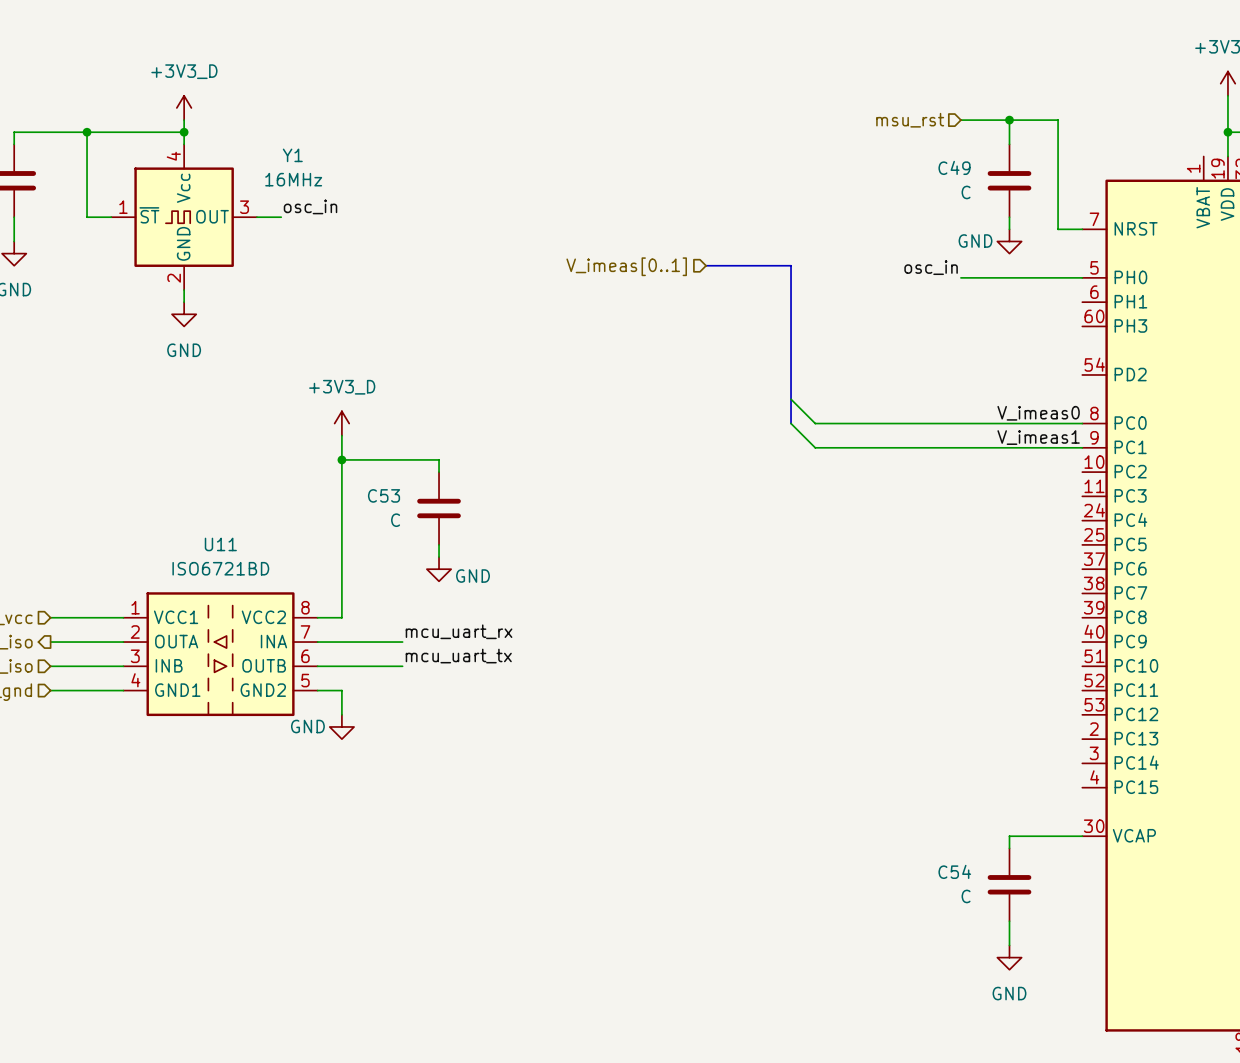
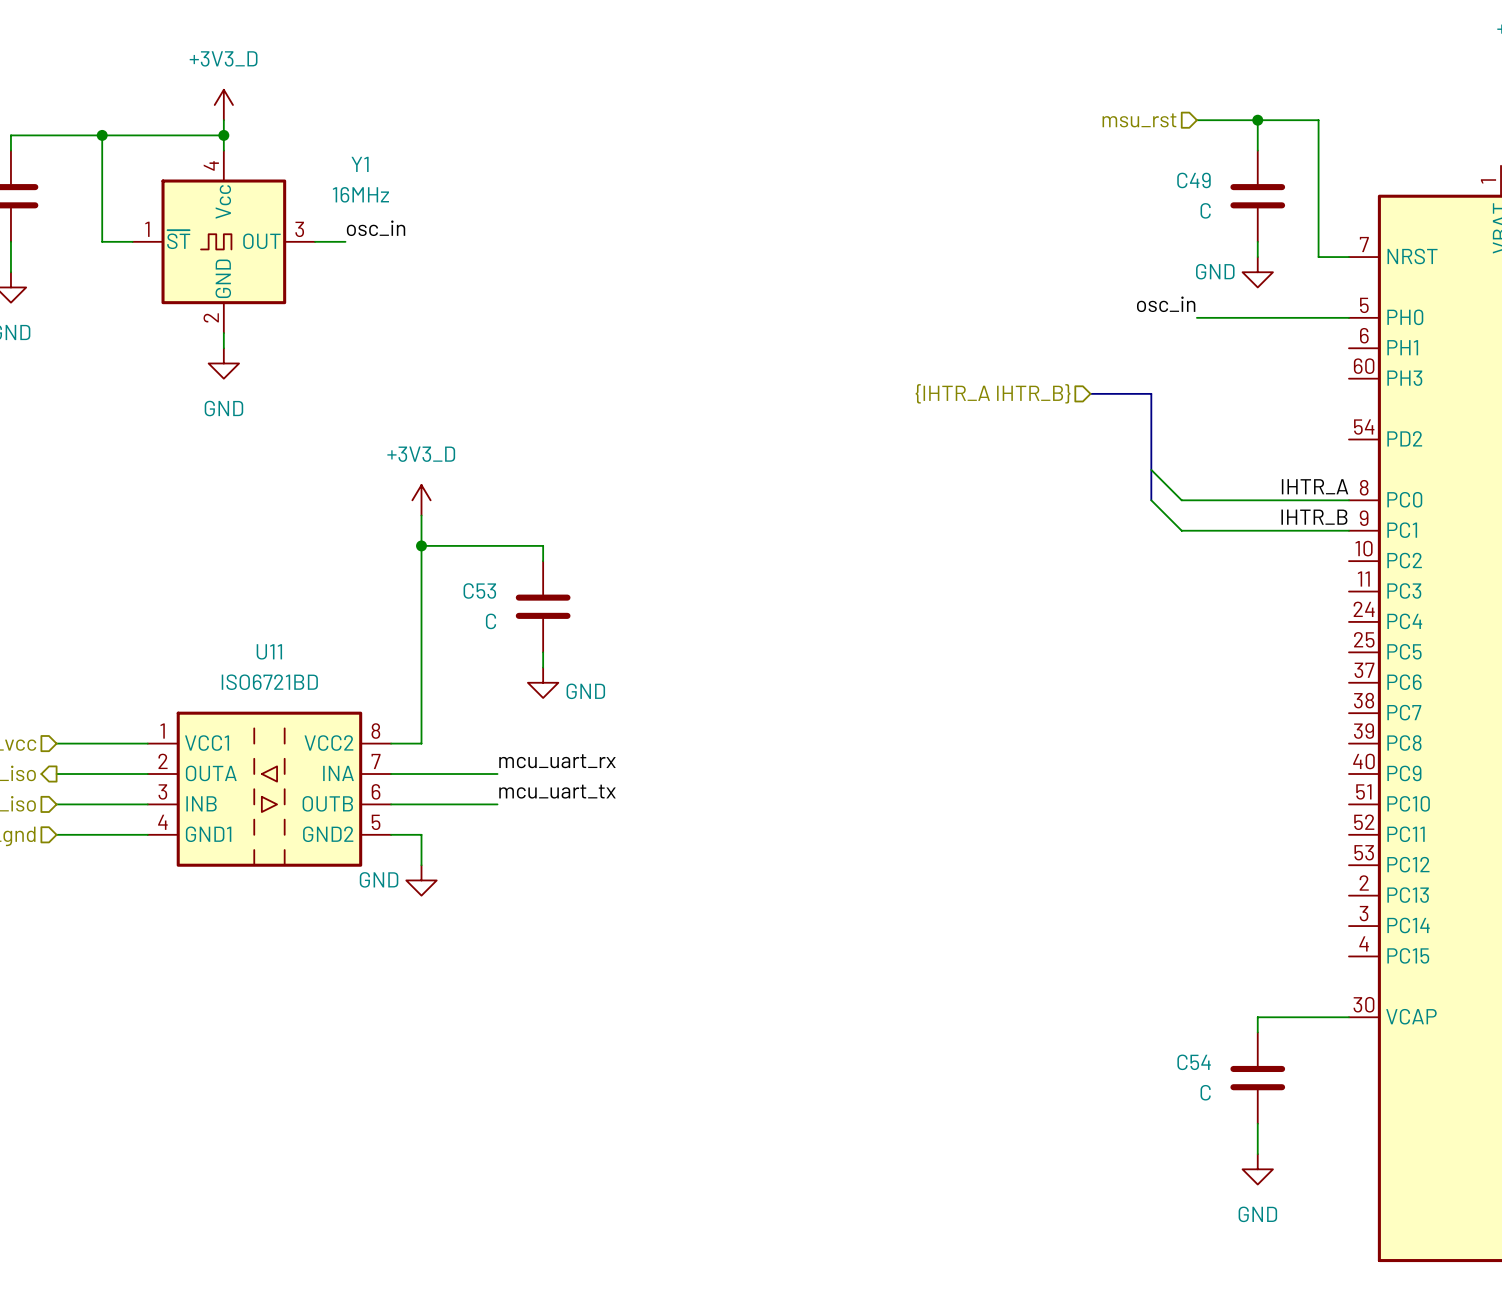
bus: (706, 265) (791, 265) (791, 423) -> none
hierarchical label: V_imeas[0..1] (626, 266) -> none
bus: none -> (1090, 393) (1151, 393) (1151, 500)
hierarchical label: none -> {IHTR_A IHTR_B} (993, 393)
wire: (791, 399) (815, 423) (948, 423) -> (1151, 469) (1181, 500)
label: V_imeas0 (1038, 413) -> IHTR_A (1315, 486)
wire: (791, 423) (815, 447) (948, 447) -> (1151, 500) (1181, 530)
label: V_imeas1 (1038, 437) -> IHTR_B (1314, 517)

